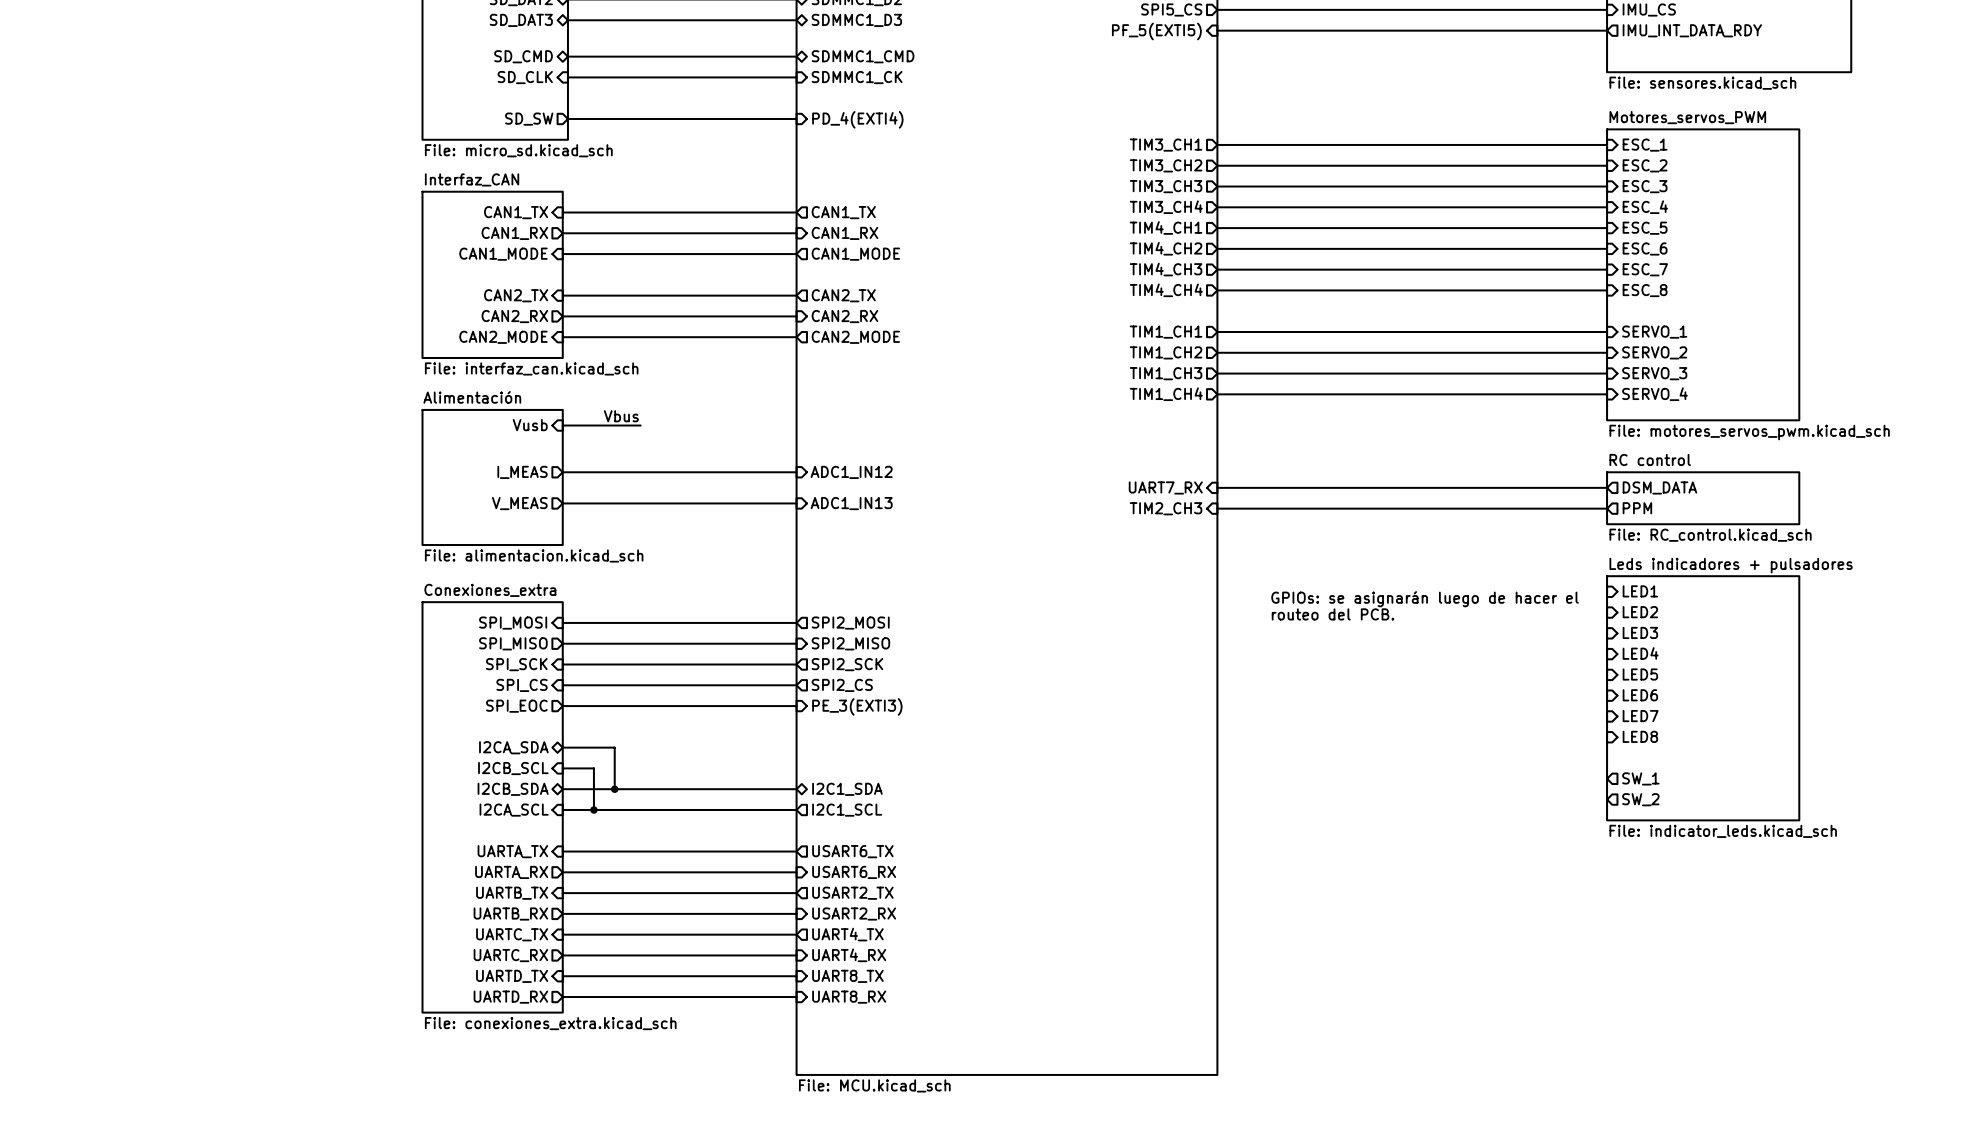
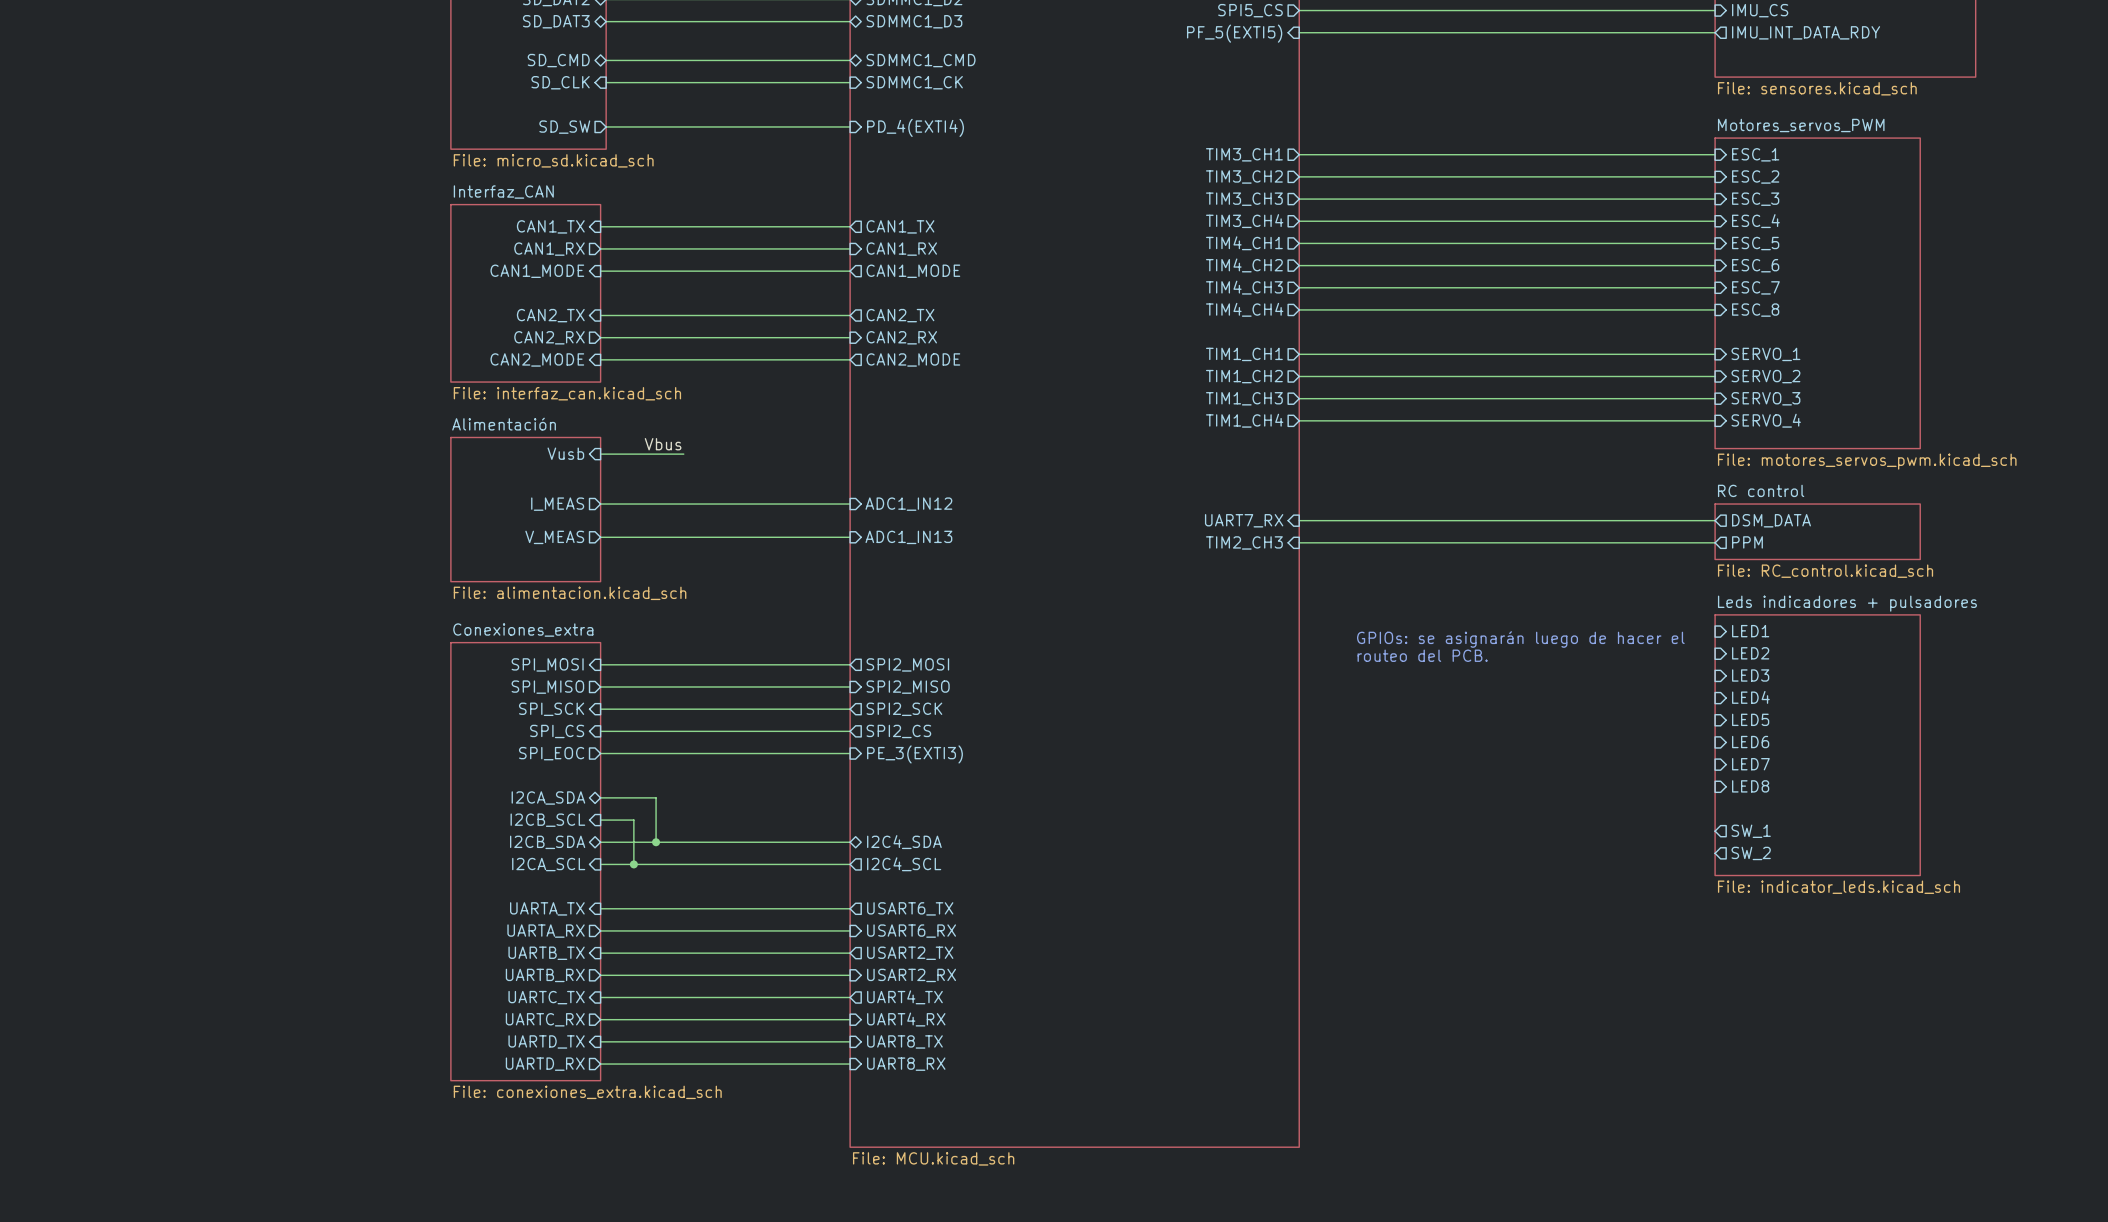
sheet pin: I2C1_SDA (847, 789) -> I2C4_SDA (904, 842)
sheet pin: I2C1_SCL (847, 810) -> I2C4_SCL (904, 864)

